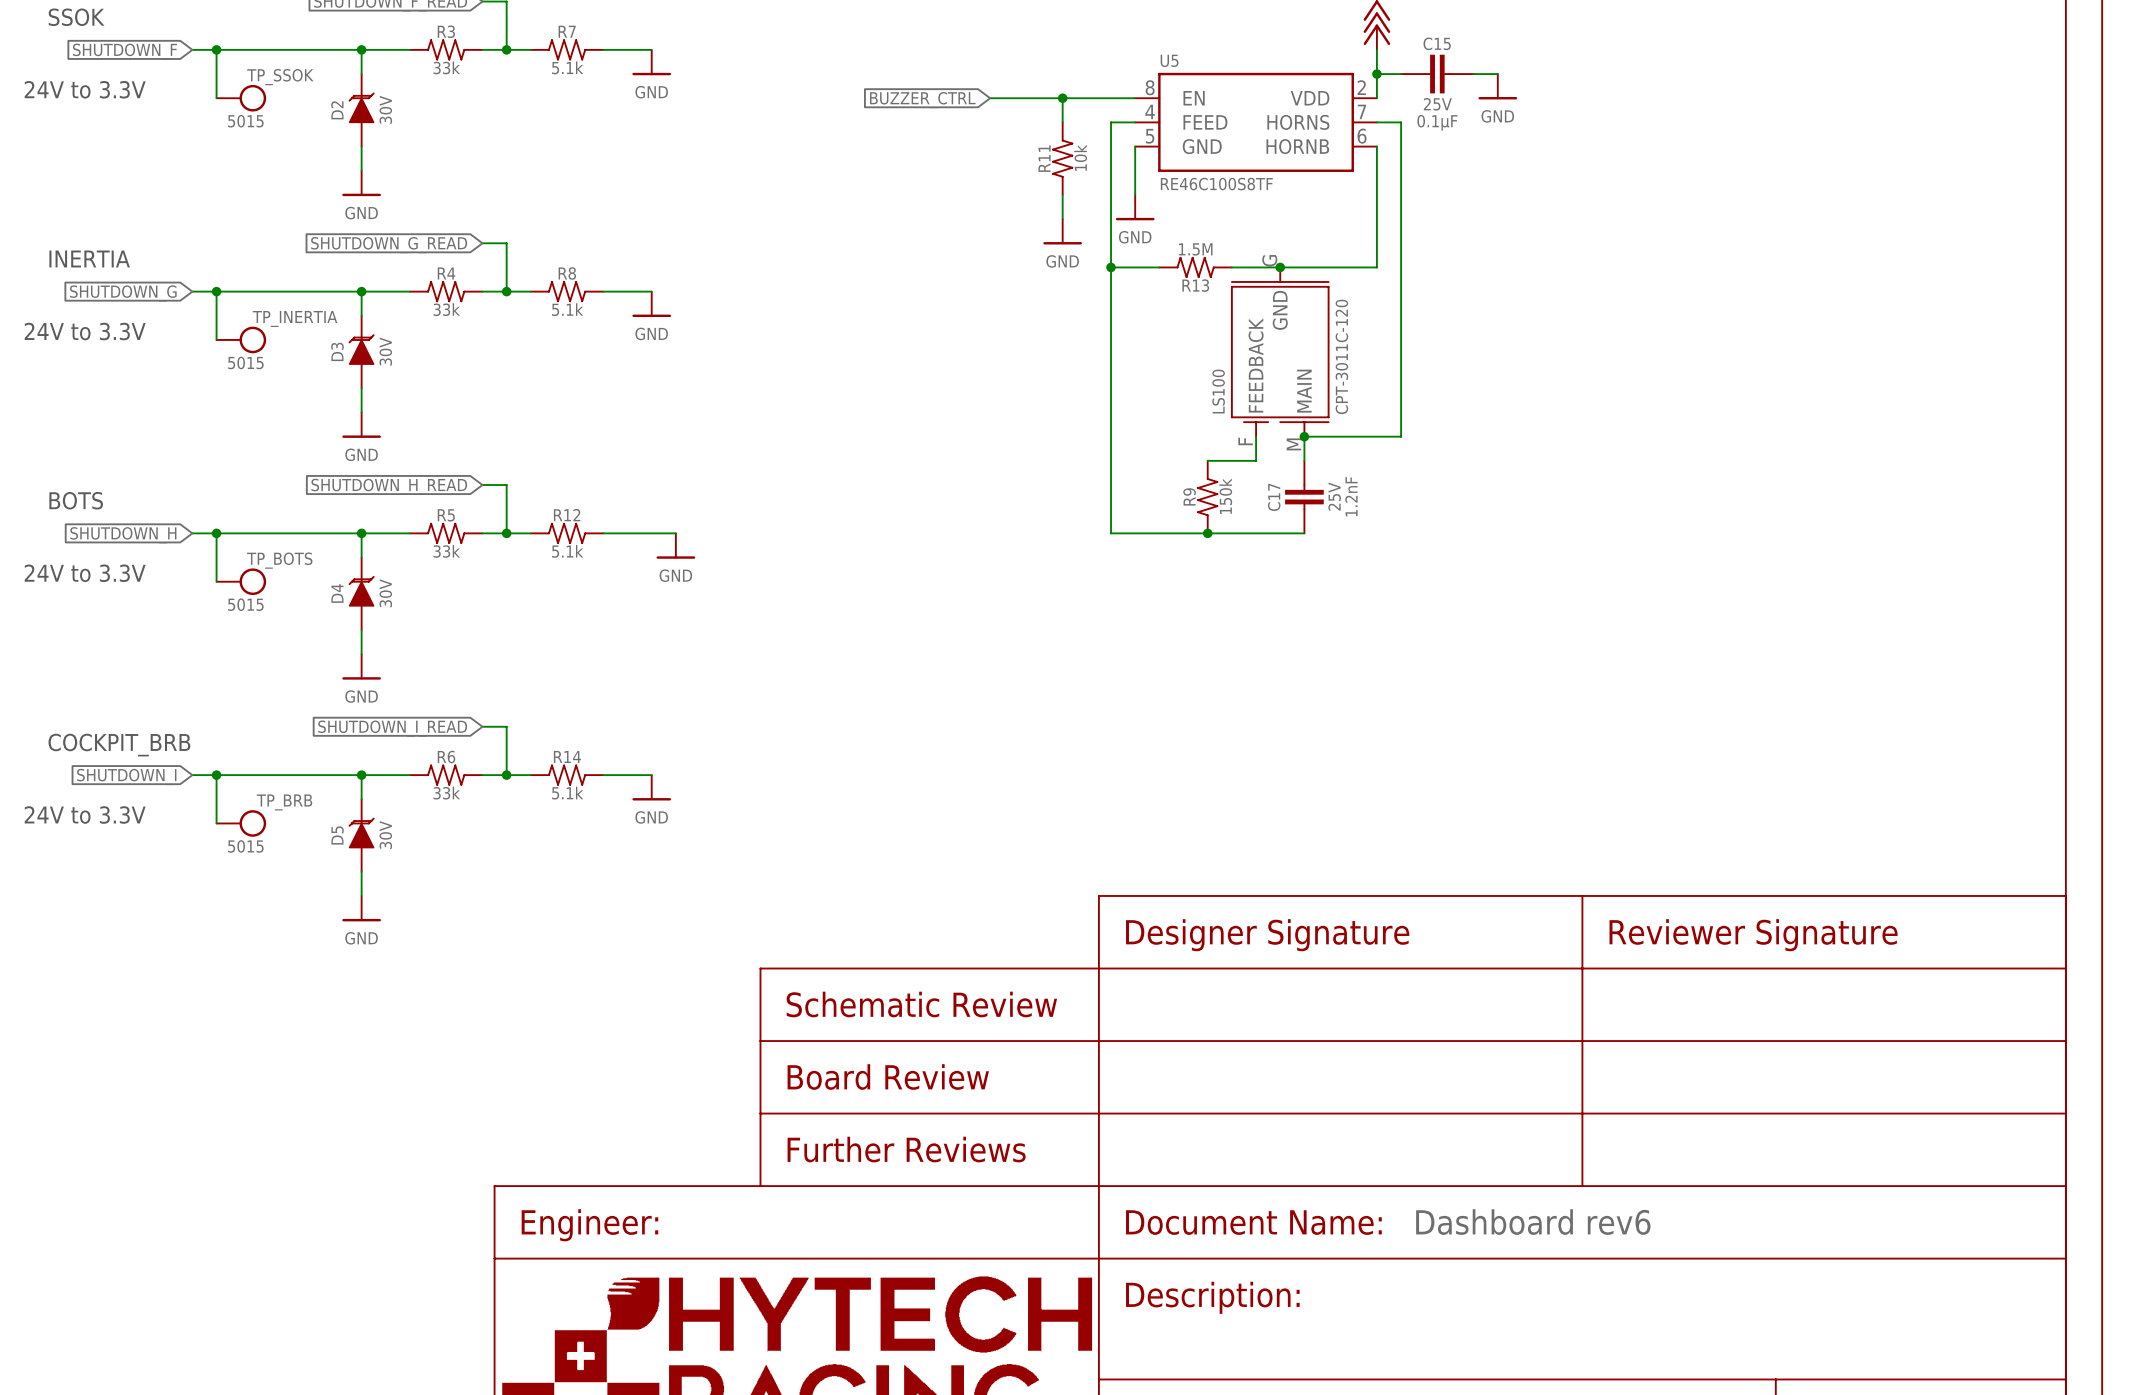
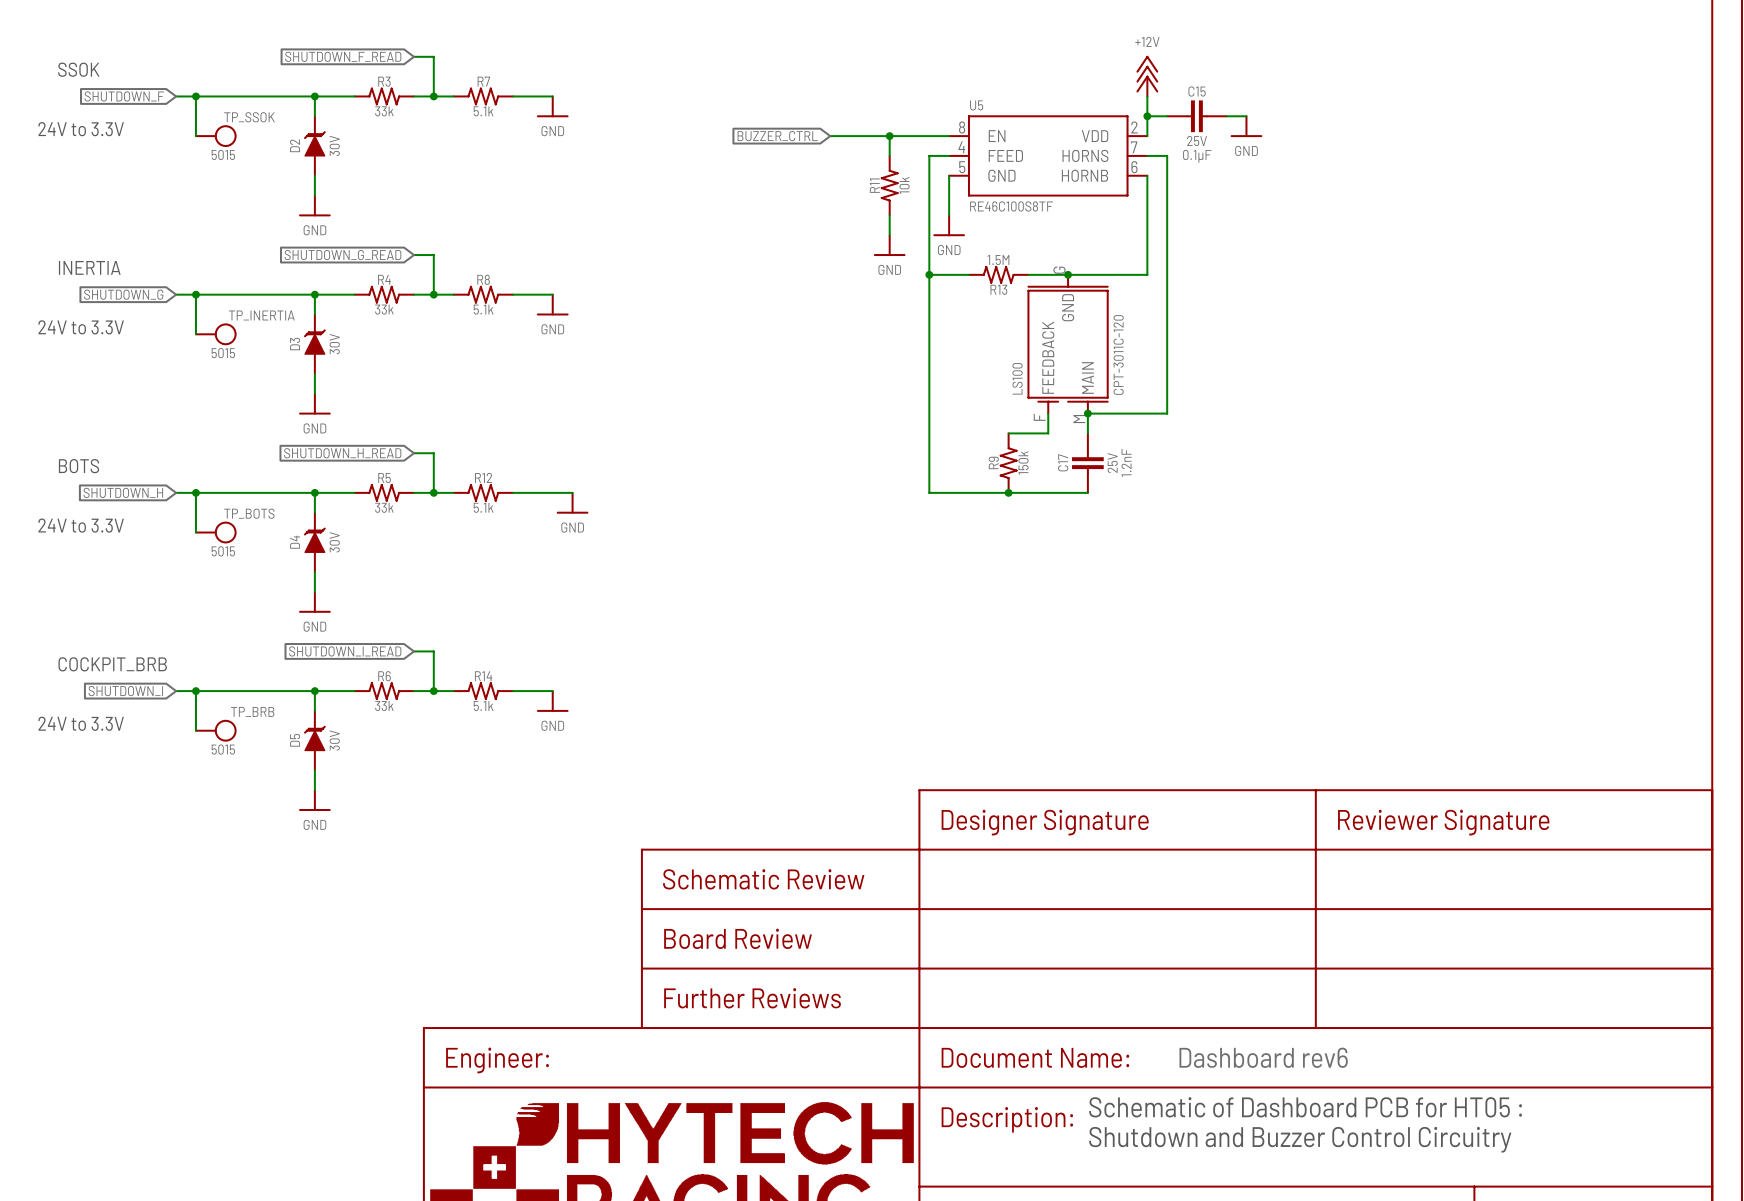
text: none -> Schematic of Dashboard PCB for HT05 : (1305, 1107)
text: none -> Shutdown and Buzzer Control Circuitry (1300, 1139)

